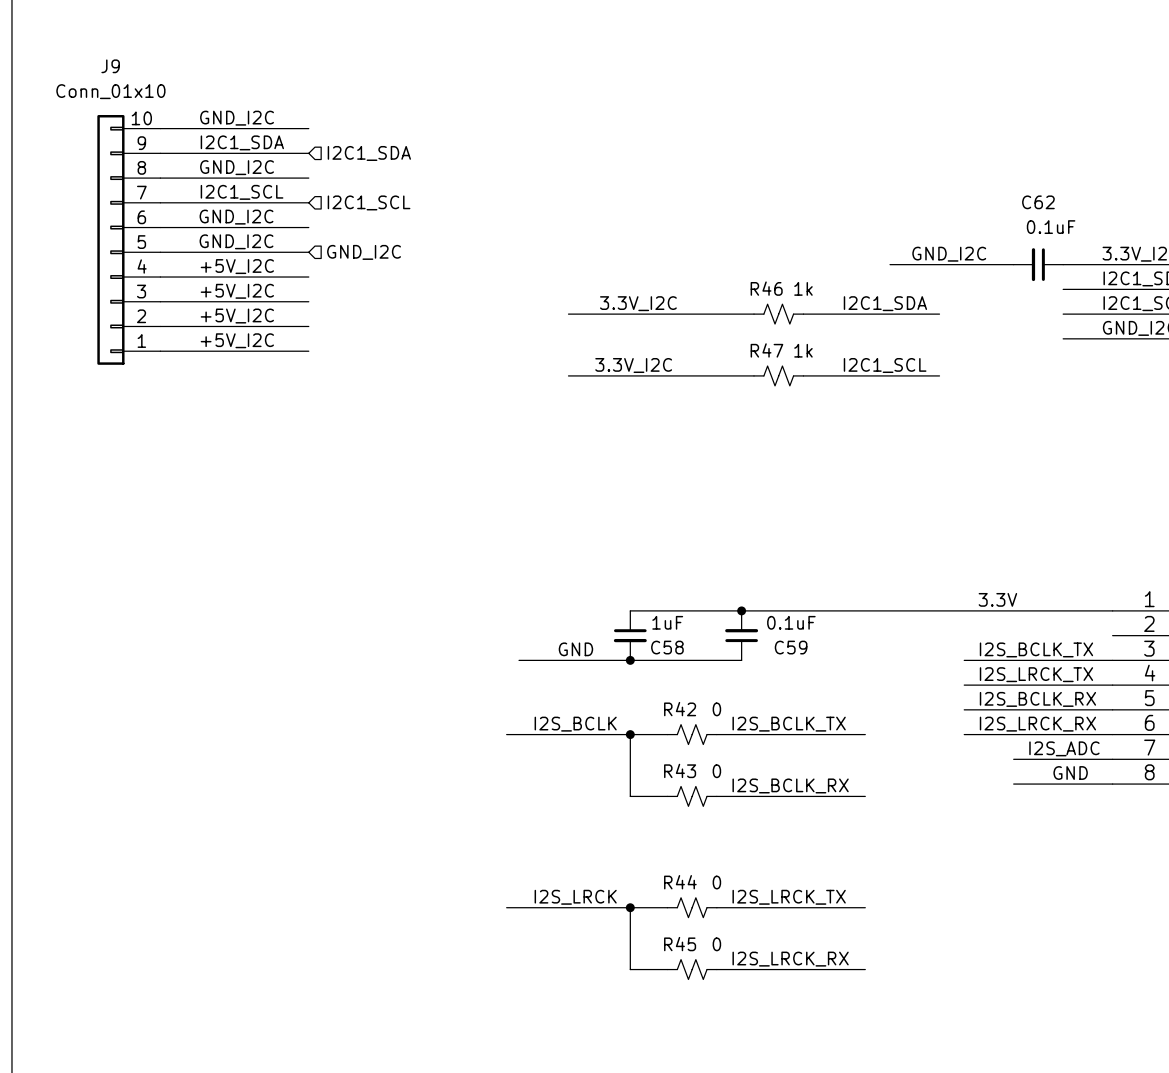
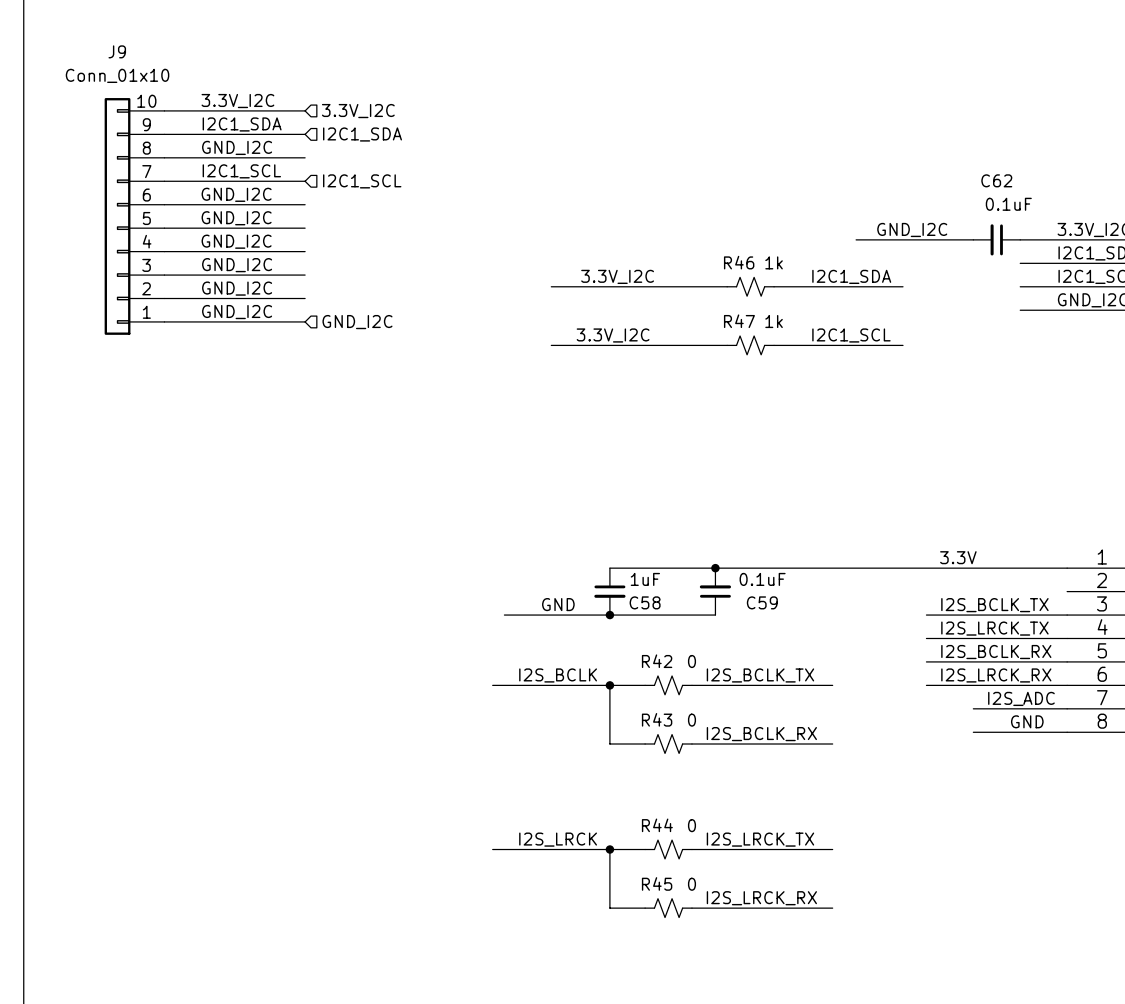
label: GND_I2C (237, 118) -> 3.3V_I2C (237, 101)
hierarchical label: none -> 3.3V_I2C (358, 111)
hierarchical label position: GND_I2C (364, 252) -> GND_I2C (357, 322)
label: +5V_I2C (237, 266) -> GND_I2C (236, 241)
label: +5V_I2C (237, 291) -> GND_I2C (237, 265)
label: +5V_I2C (237, 316) -> GND_I2C (237, 288)
label: +5V_I2C (237, 340) -> GND_I2C (237, 312)

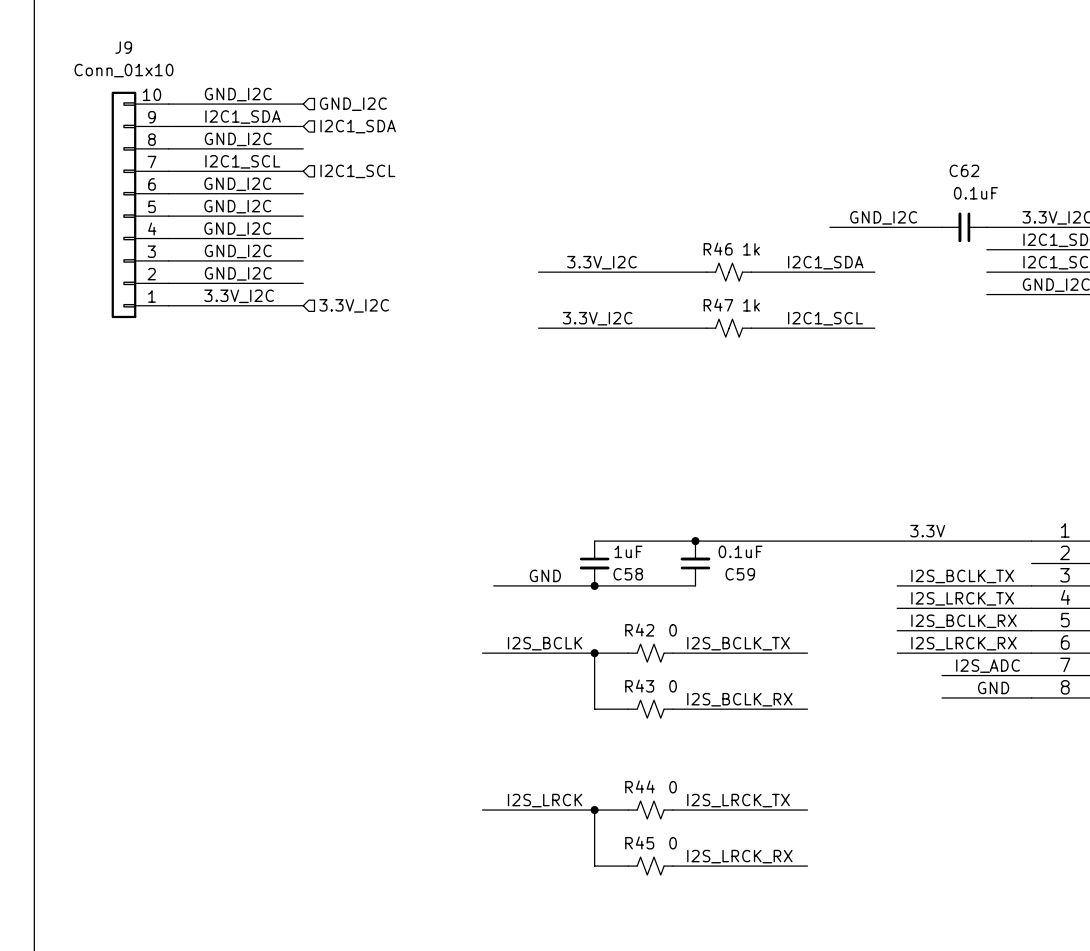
label: 3.3V_I2C (237, 101) -> GND_I2C (238, 94)
hierarchical label: 3.3V_I2C (358, 111) -> GND_I2C (353, 104)
label: GND_I2C (237, 312) -> 3.3V_I2C (239, 296)
hierarchical label: GND_I2C (357, 322) -> 3.3V_I2C (354, 305)

